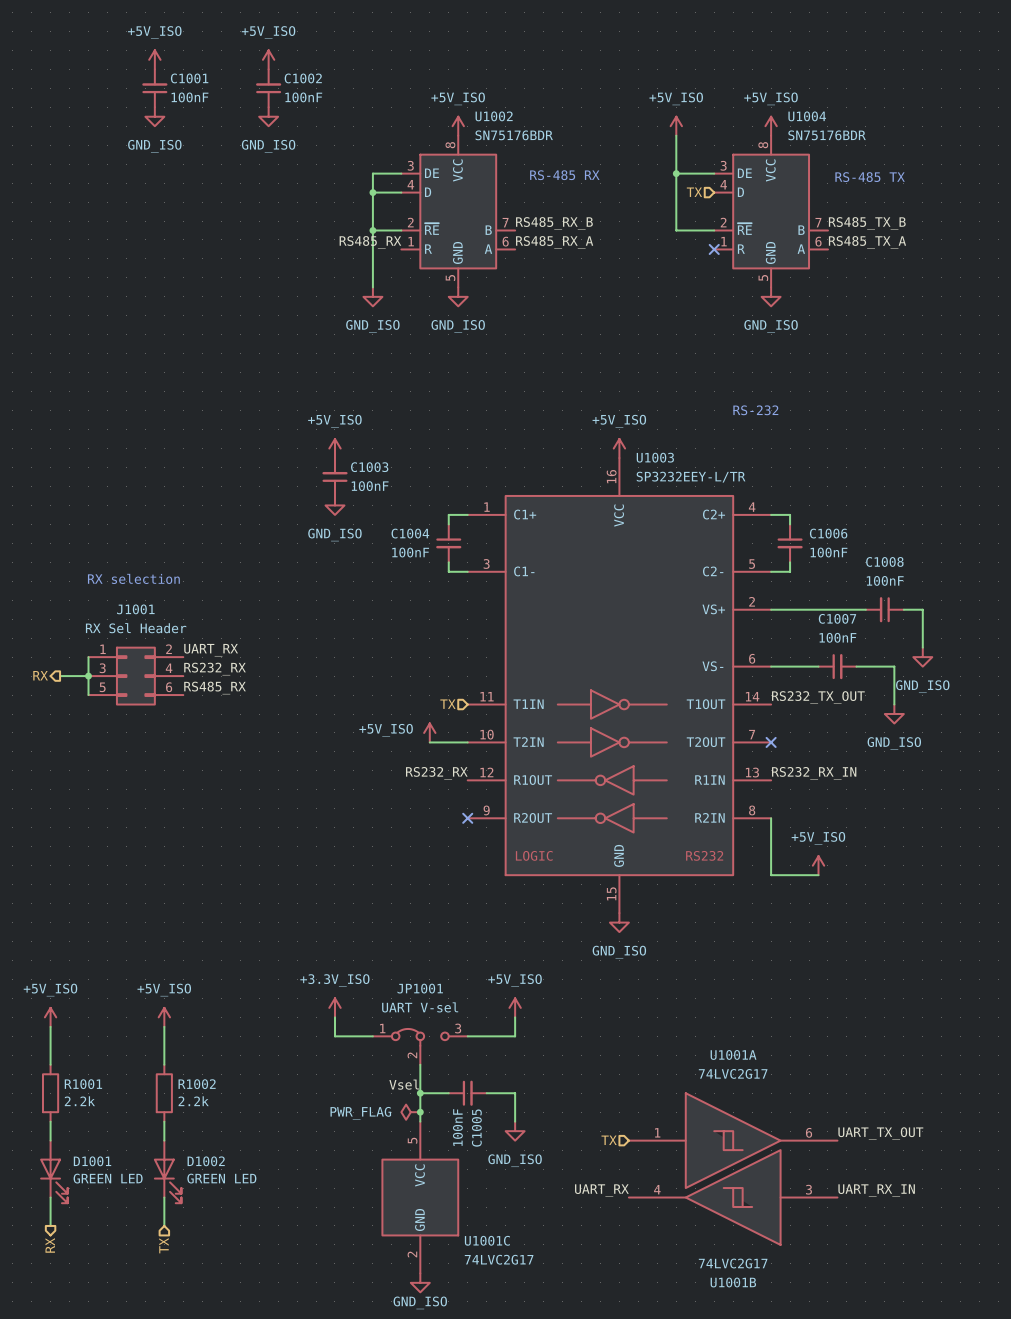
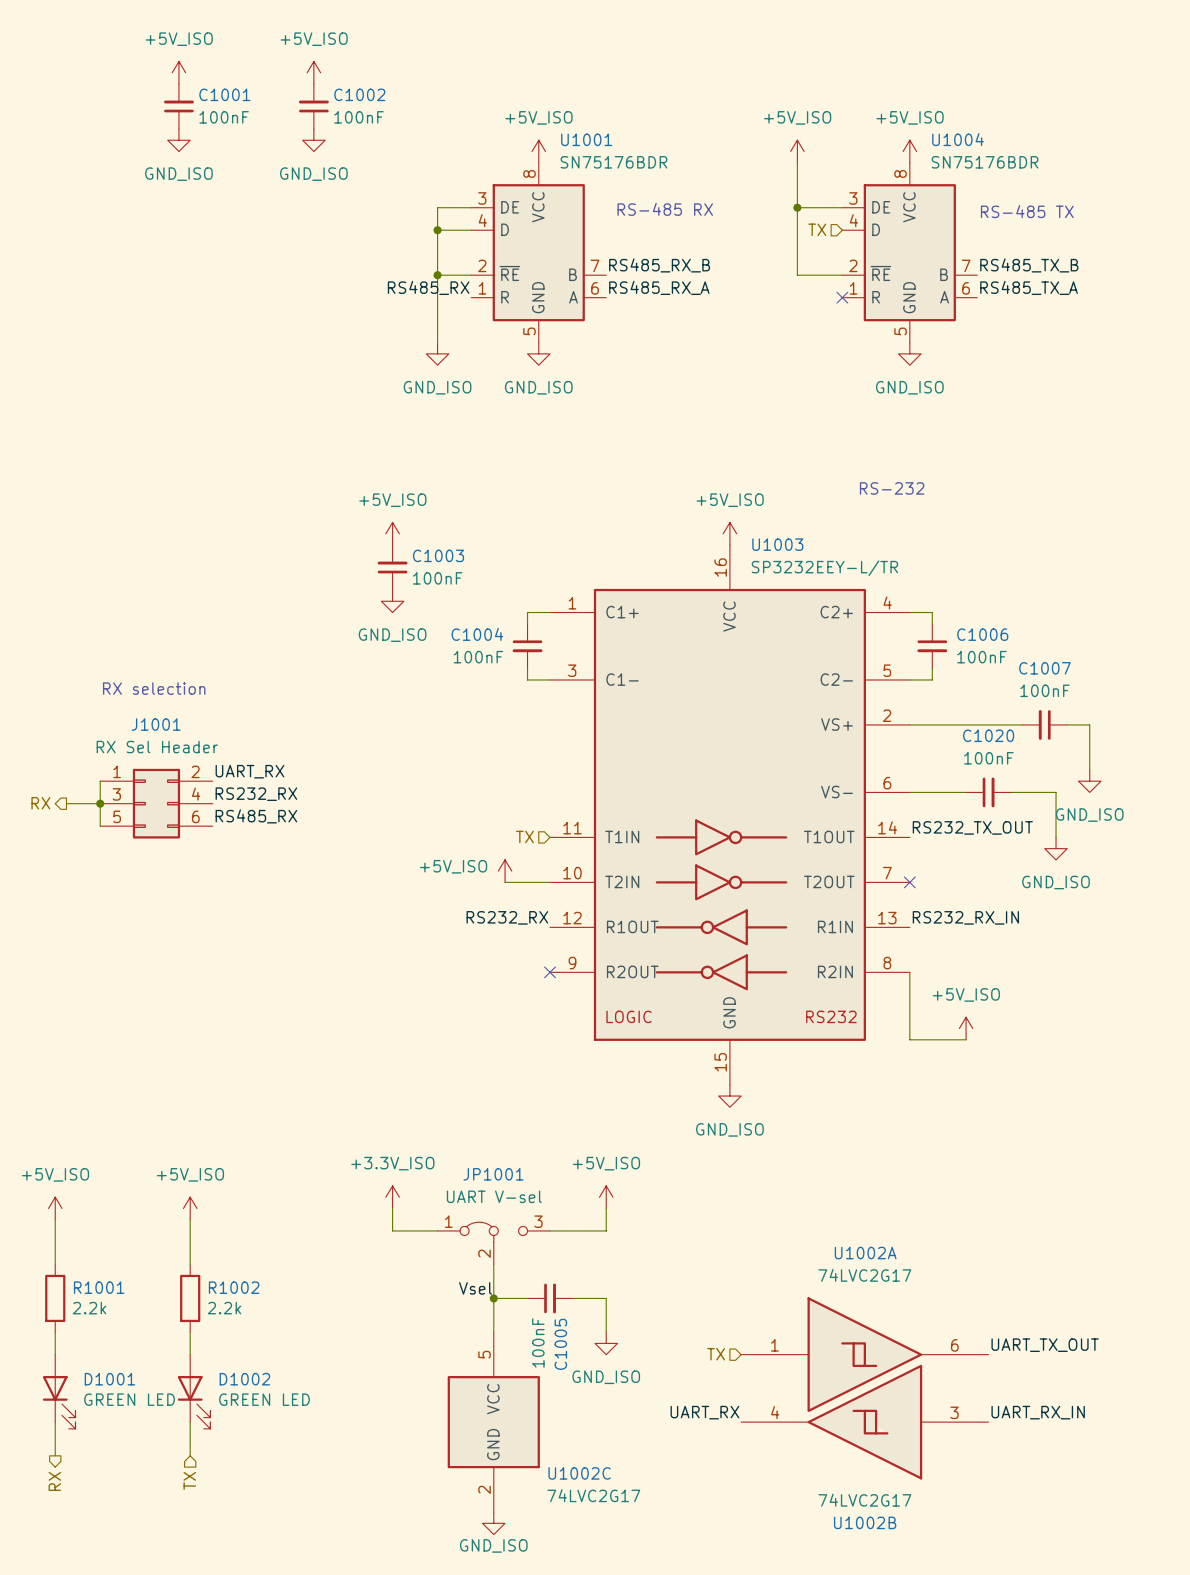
U1002 name: U1002 (494, 116) -> U1001 (586, 139)
C1008 name: C1008 (884, 561) -> C1007 (1044, 668)
C1007 name: C1007 (837, 618) -> C1020 (988, 735)
U1001A name: U1001A (733, 1054) -> U1002A (865, 1253)
power symbol: PWR_FLAG (410, 1112) -> none
junction: (420, 1112) -> none
U1001C name: U1001C (487, 1240) -> U1002C (579, 1473)
U1001B name: U1001B (733, 1282) -> U1002B (865, 1522)

